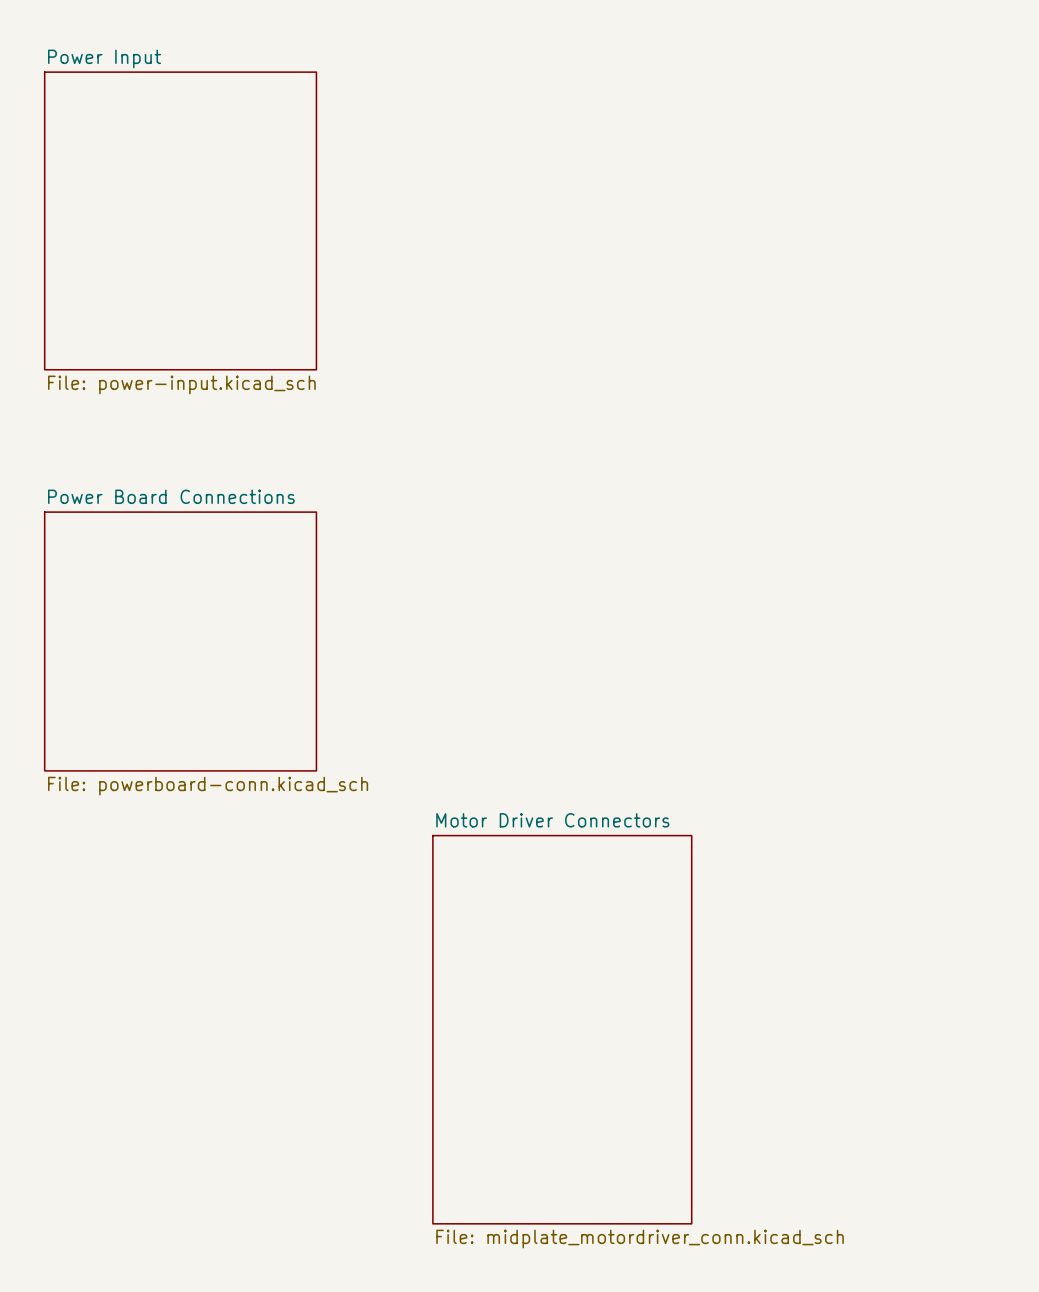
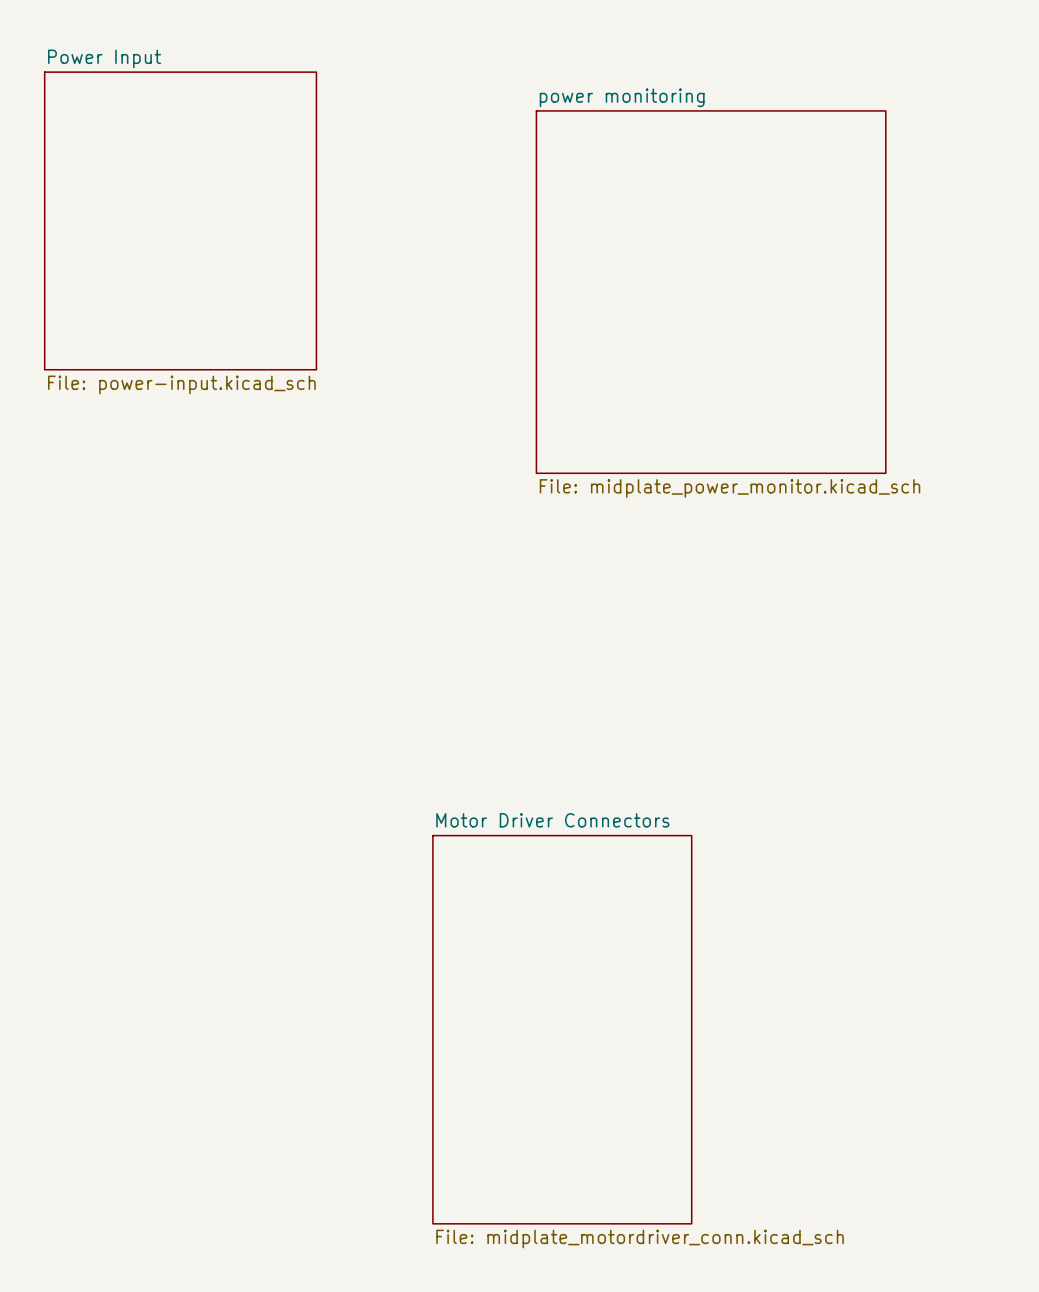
sheet power monitoring: none -> File: midplate_power_monitor.kicad_sch (711, 292)
sheet Power Board Connections: File: powerboard-conn.kicad_sch (180, 641) -> none

